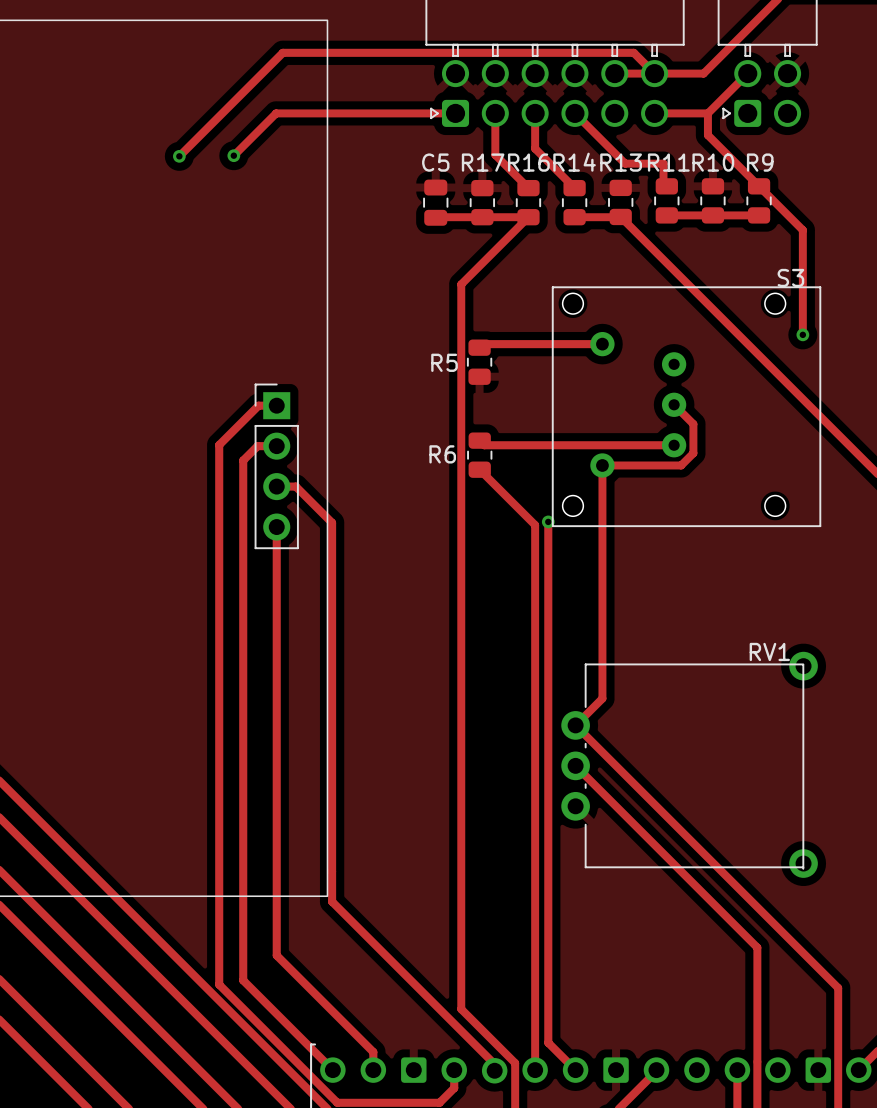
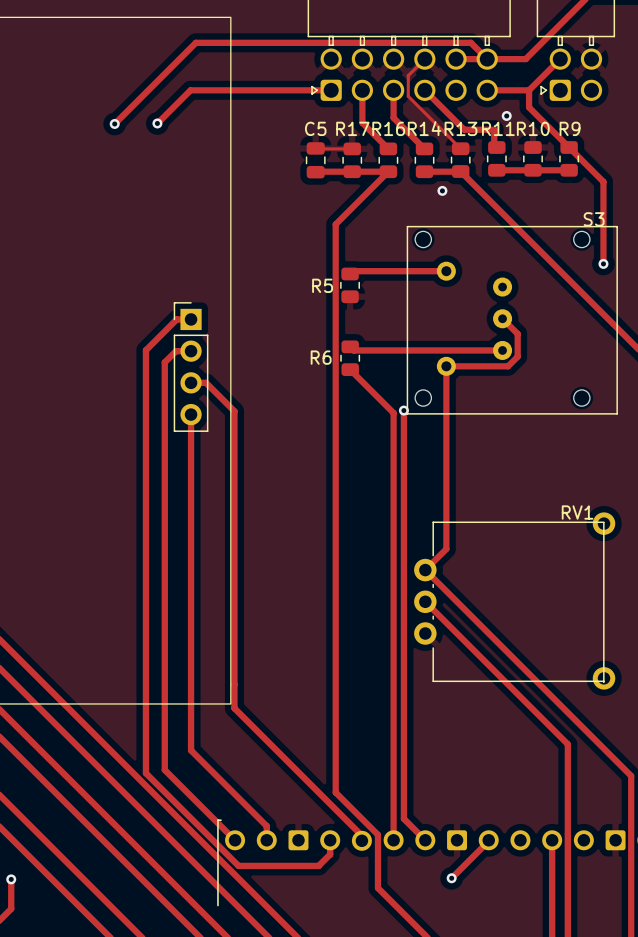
track: none -> (424, 59) (408, 75) (408, 96) (460, 148)
via: none -> (506, 115)
track: none -> (315, 148) (352, 148)
via: none -> (442, 190)

